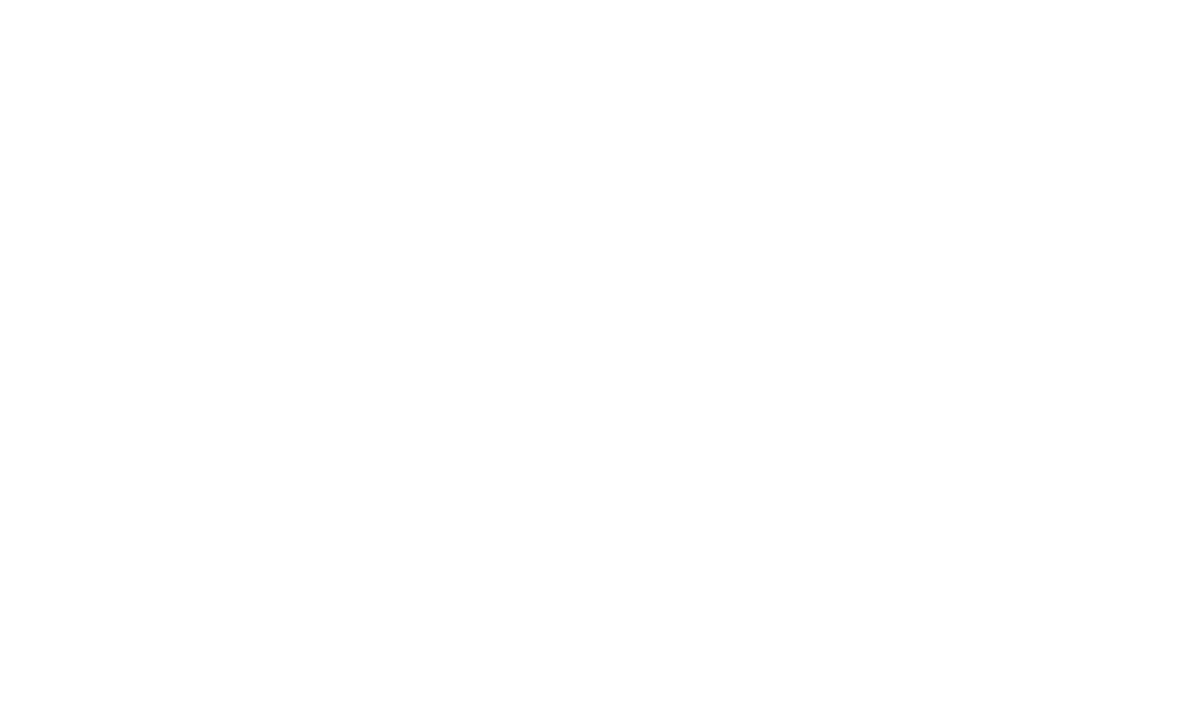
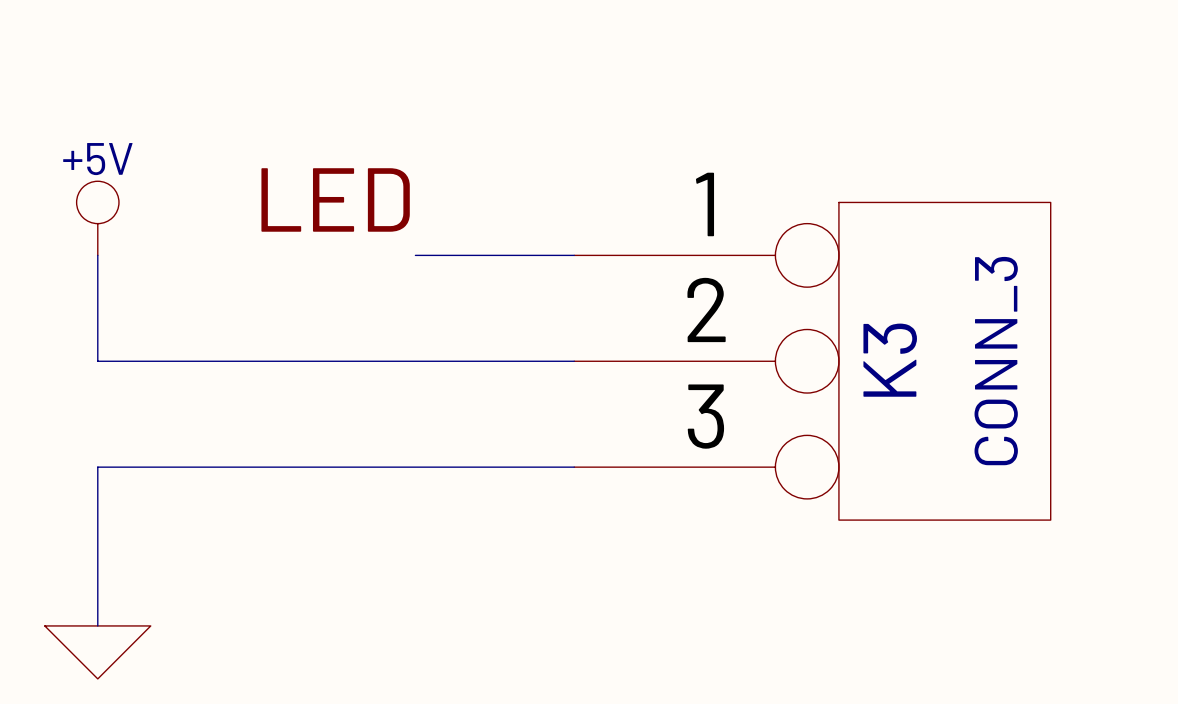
label: none -> LED (335, 199)
power symbol: none -> +5V (97, 218)
wire: none -> (97, 255) (97, 361) (574, 361)
wire: none -> (415, 255) (574, 255)
K3: none -> CONN_3 (812, 361)
wire: none -> (574, 467) (97, 467) (97, 625)
power symbol: none -> (97, 652)

